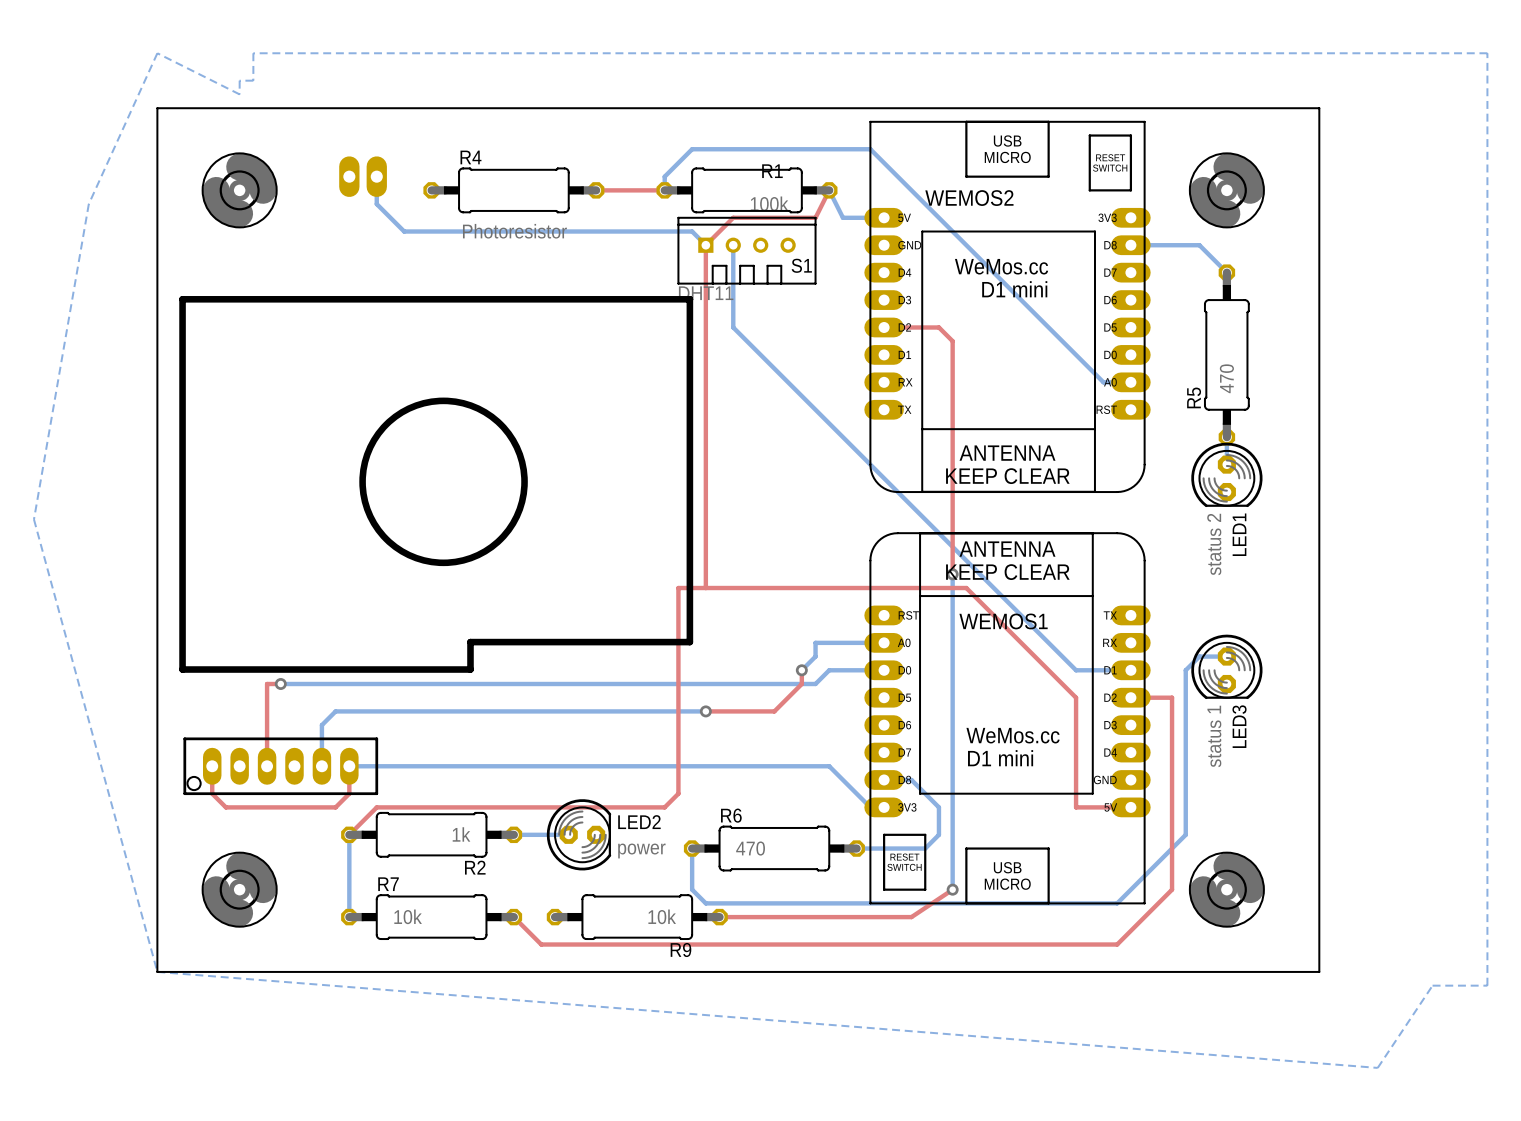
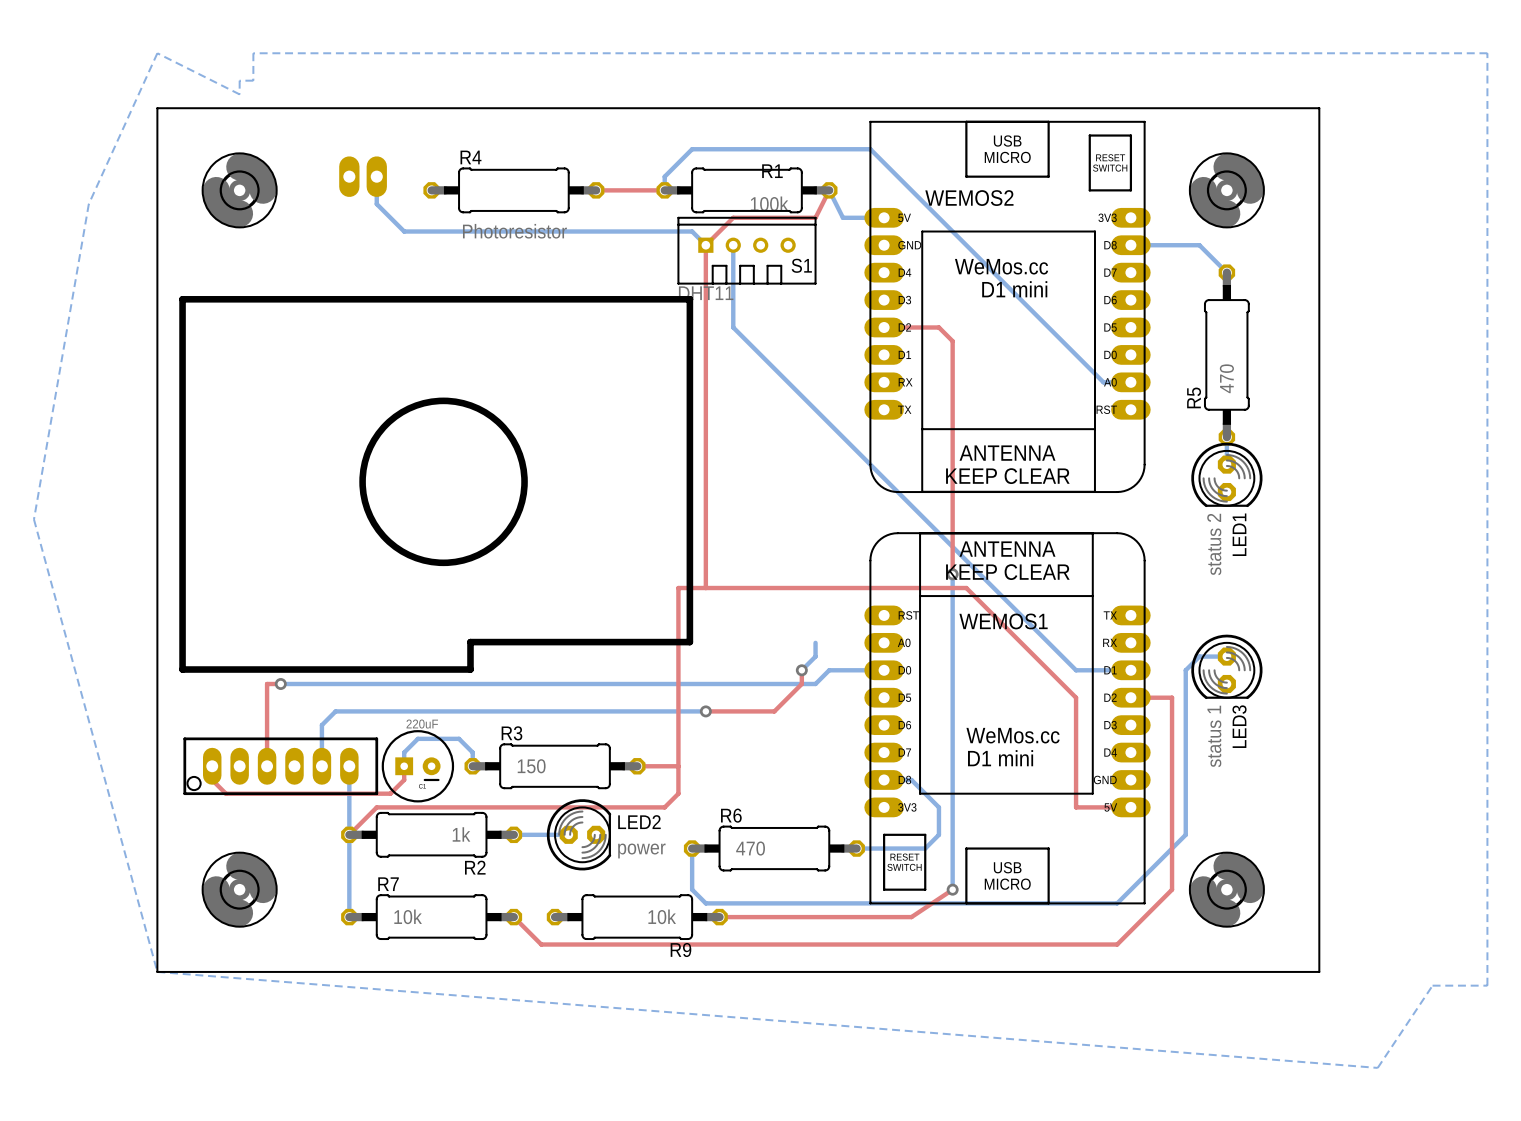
bottom track: (815, 642) (884, 642) -> none
top track: (349, 766) (349, 793) (335, 807) (225, 807) (212, 793) (212, 779) -> (404, 766) (404, 779) (390, 793) (225, 793) (212, 779)
bottom track: (349, 766) (829, 766) (870, 807) (884, 807) -> (349, 766) (349, 834)
bottom track: none -> (404, 766) (404, 752) (417, 738) (459, 738) (472, 752) (472, 766)
part: none -> 220uF (417, 766)
R3: none -> 150 (555, 766)
top track: none -> (637, 766) (678, 766)

